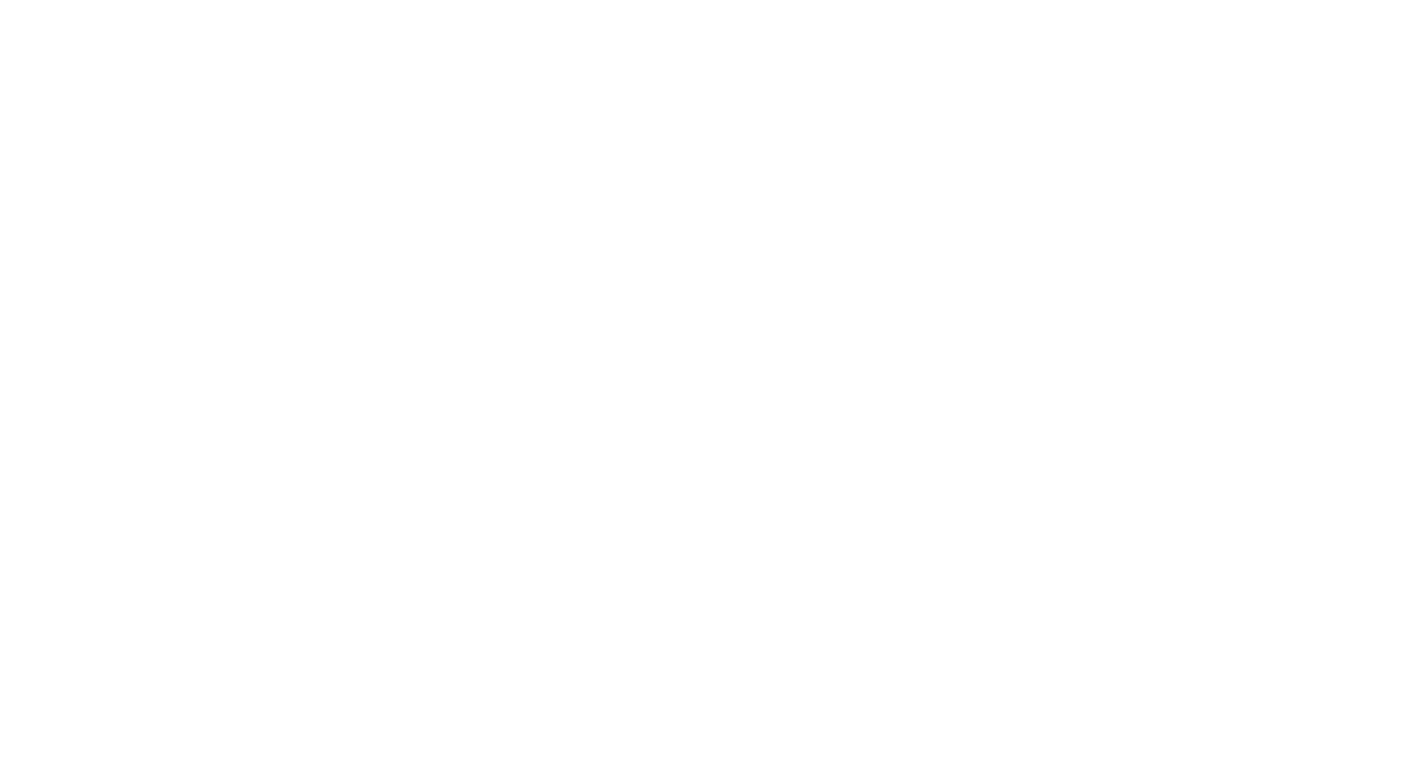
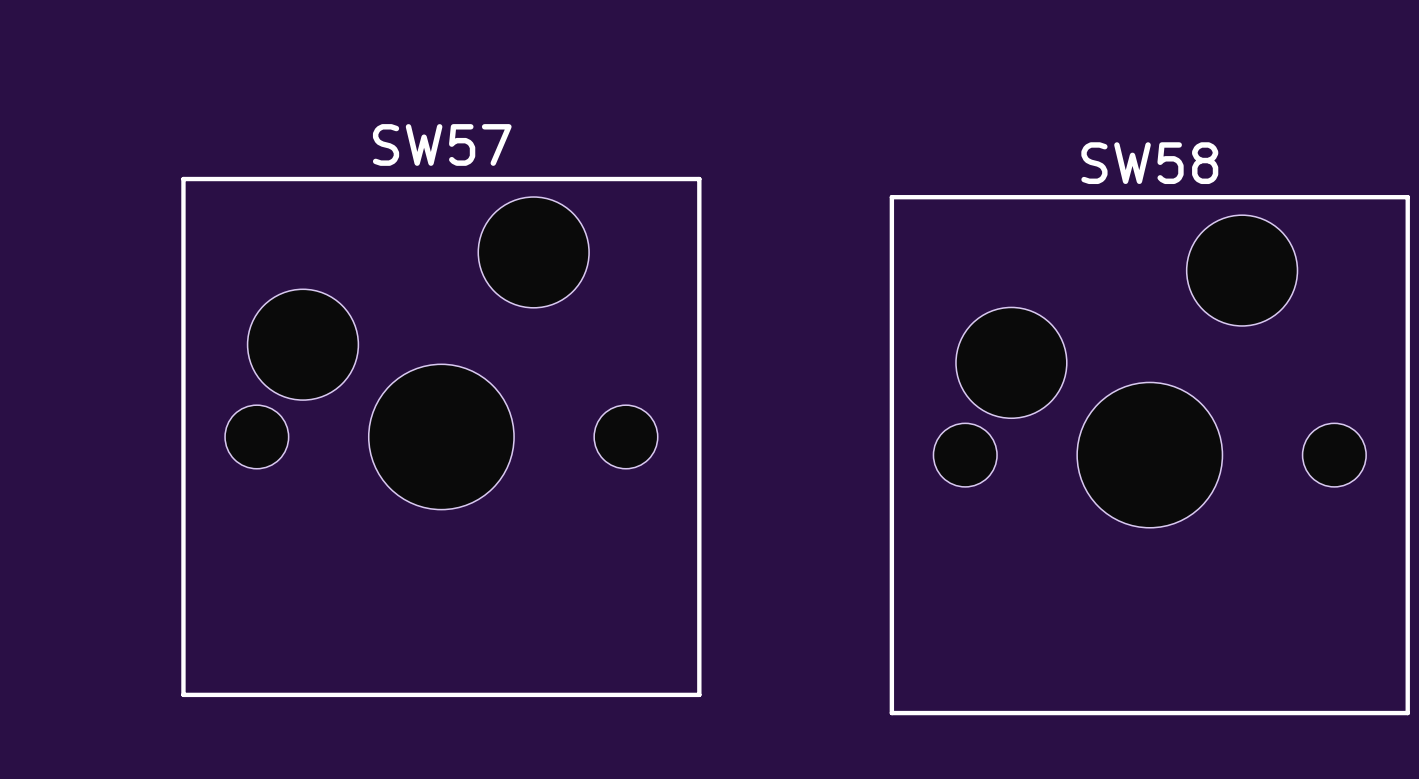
SW57: none -> (441, 436)
SW58: none -> (1149, 455)

